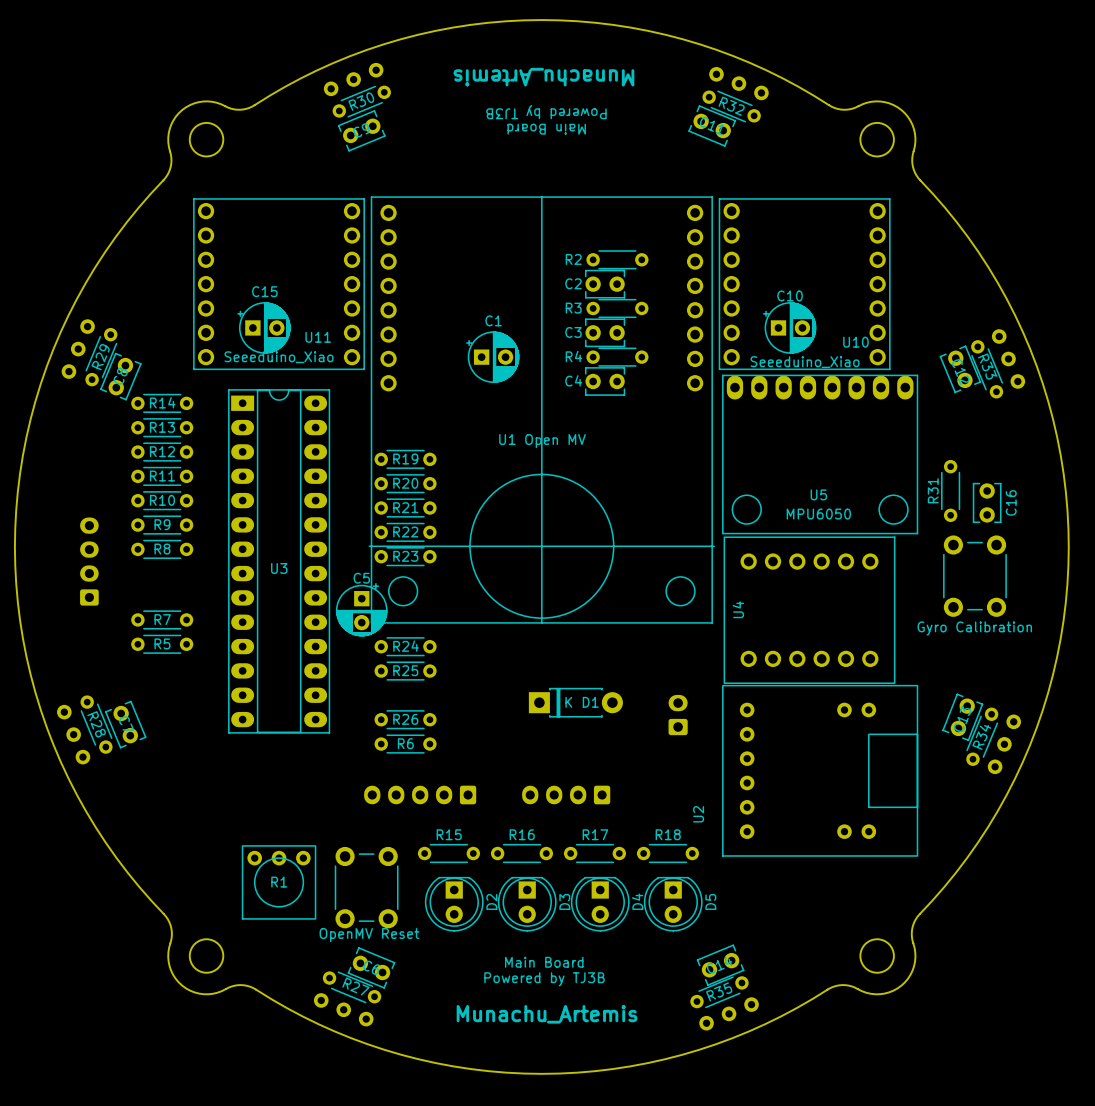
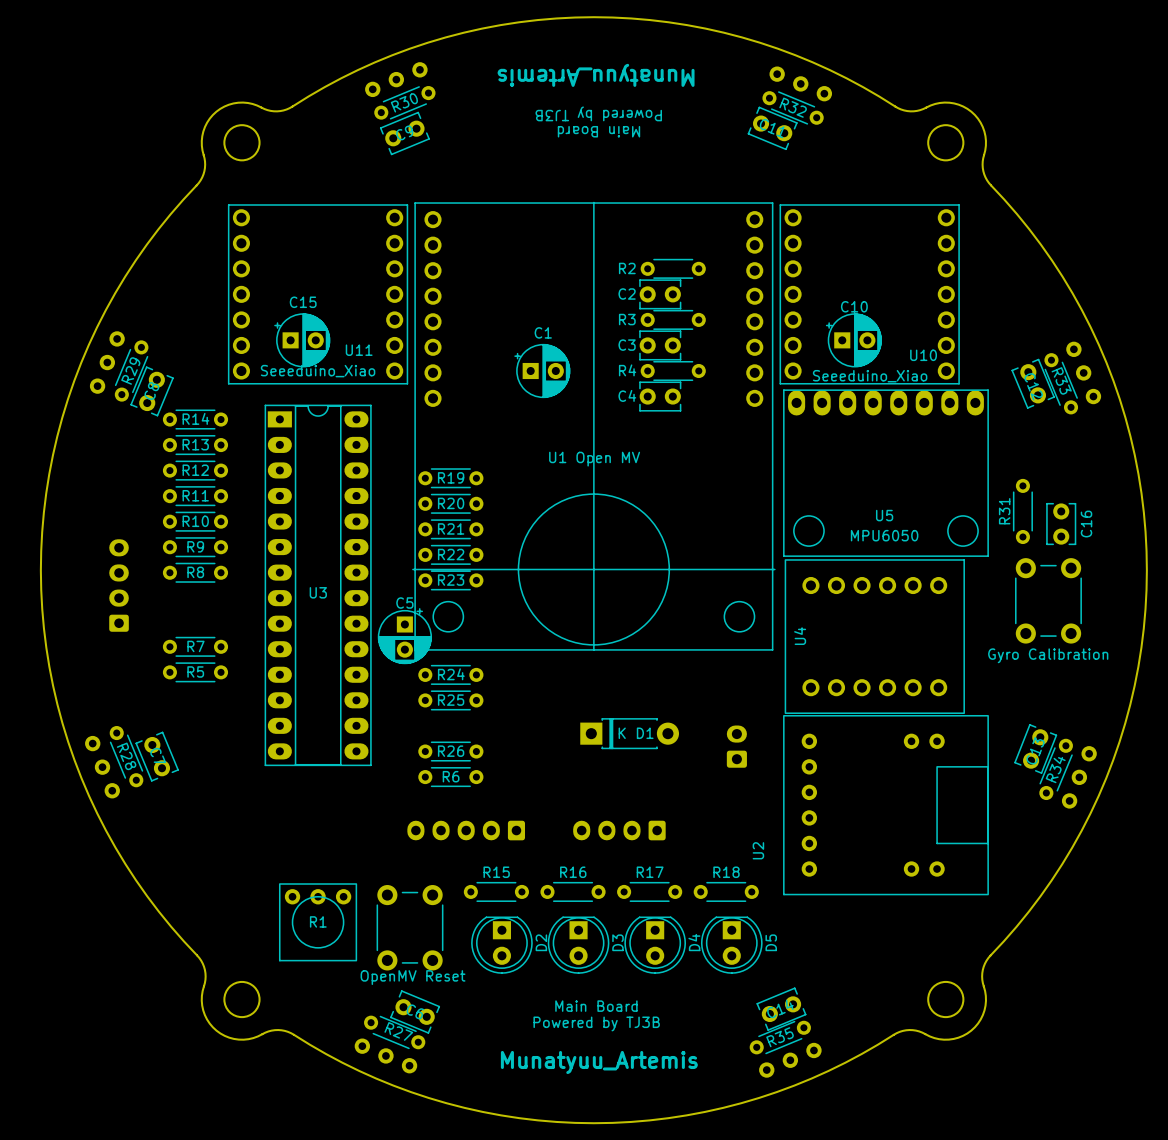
text: Munachu_Artemis (543, 77) -> Munatyuu_Artemis (596, 75)
text: Munachu_Artemis (547, 1014) -> Munatyuu_Artemis (599, 1062)

